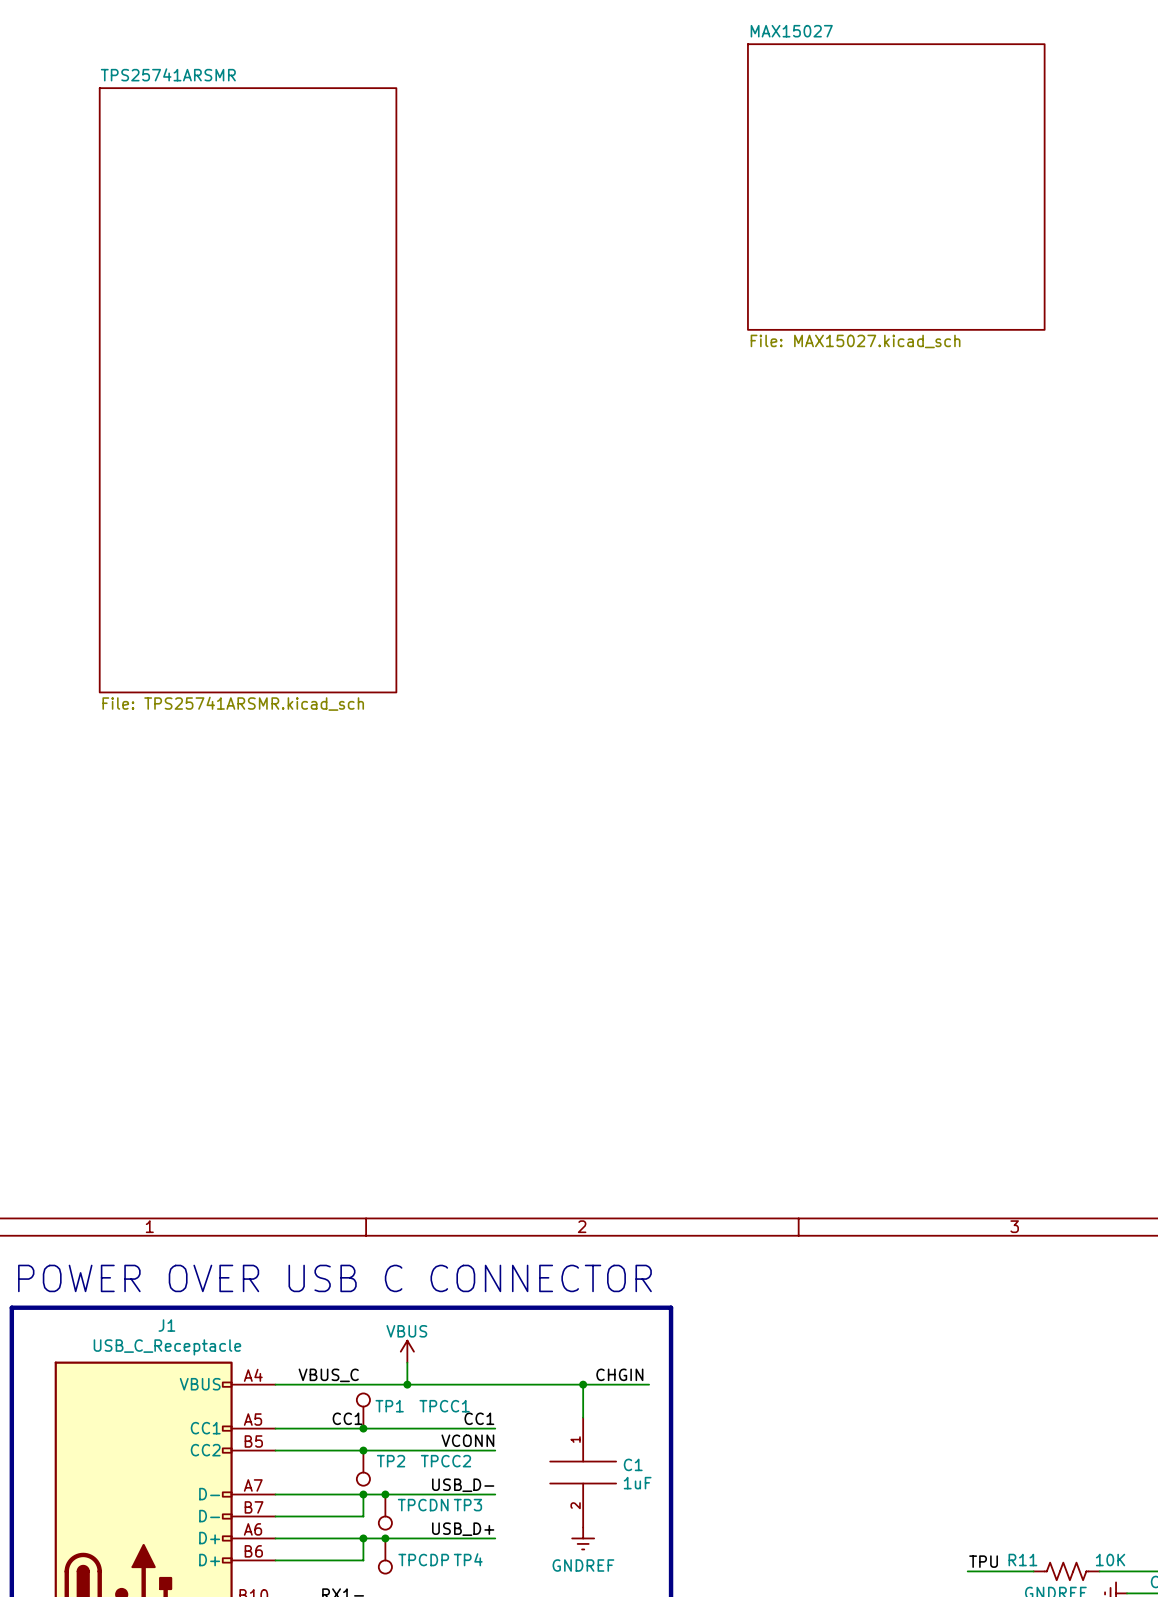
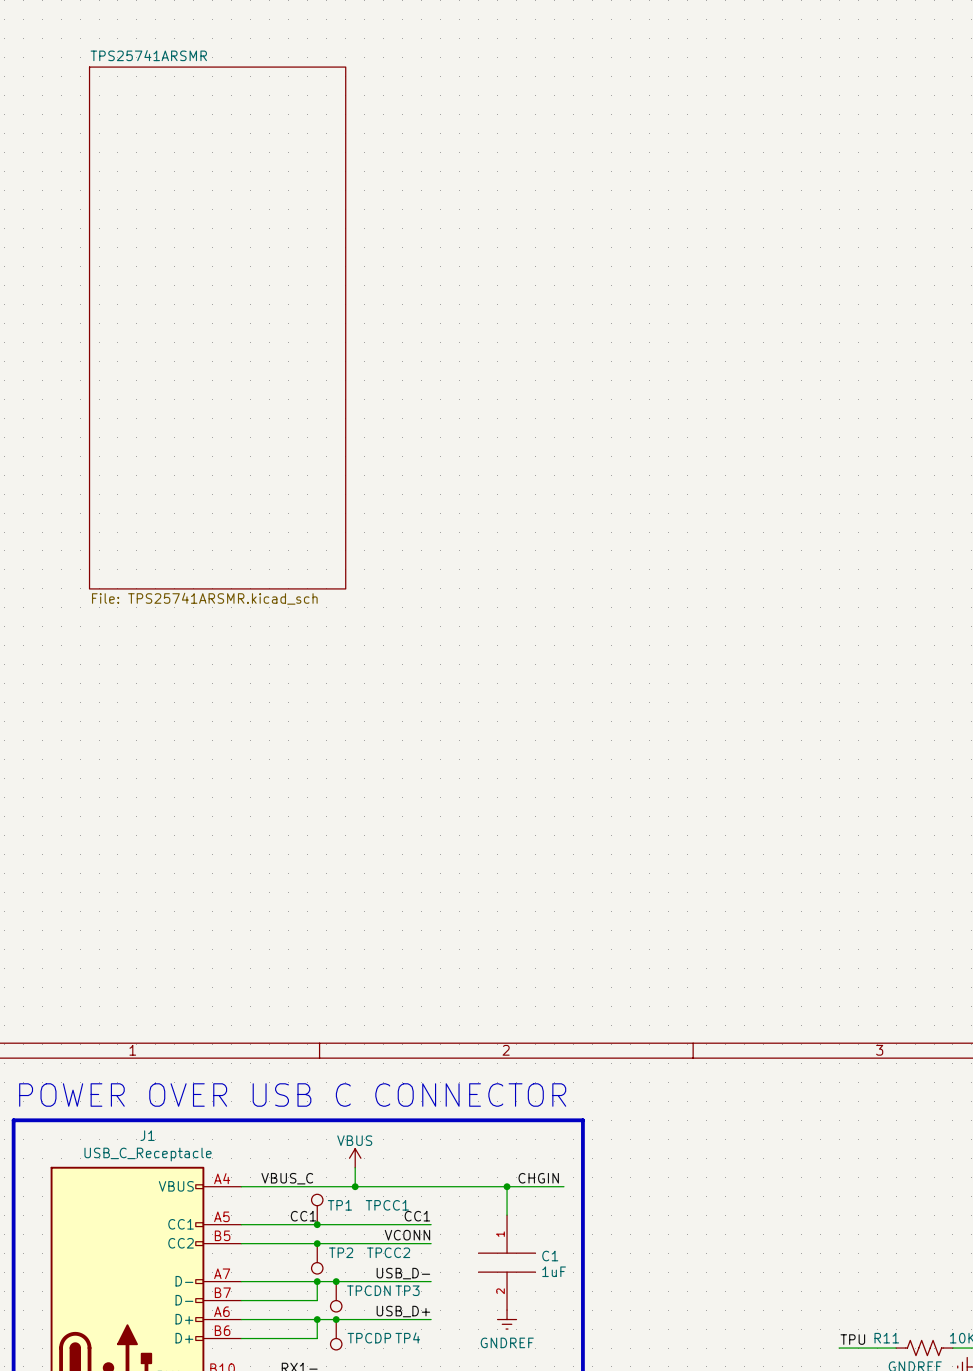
sheet MAX15027: File: MAX15027.kicad_sch (896, 187) -> none

